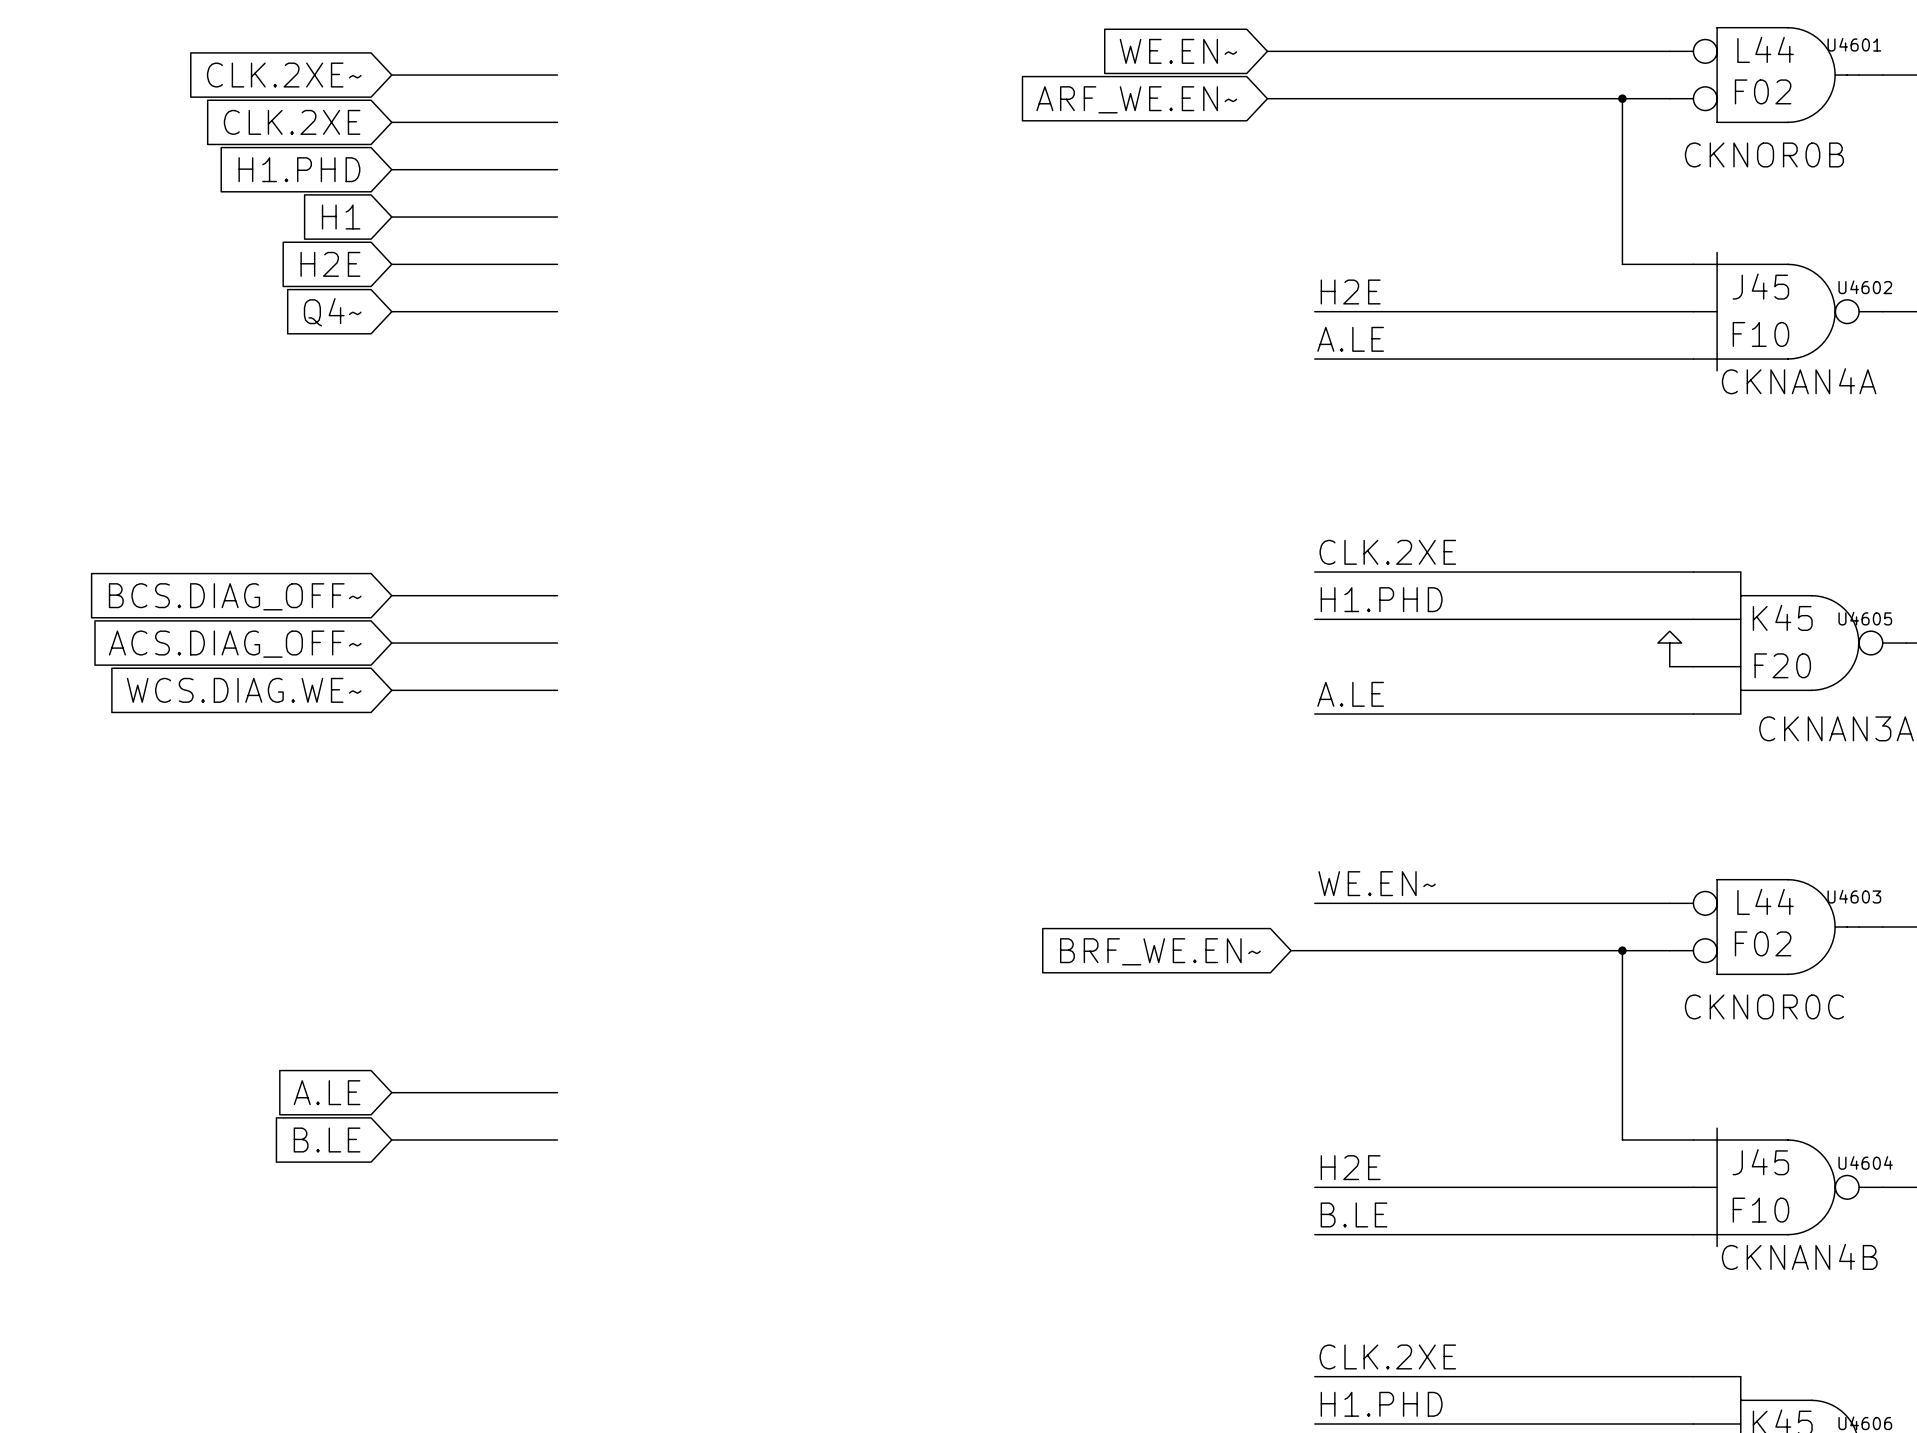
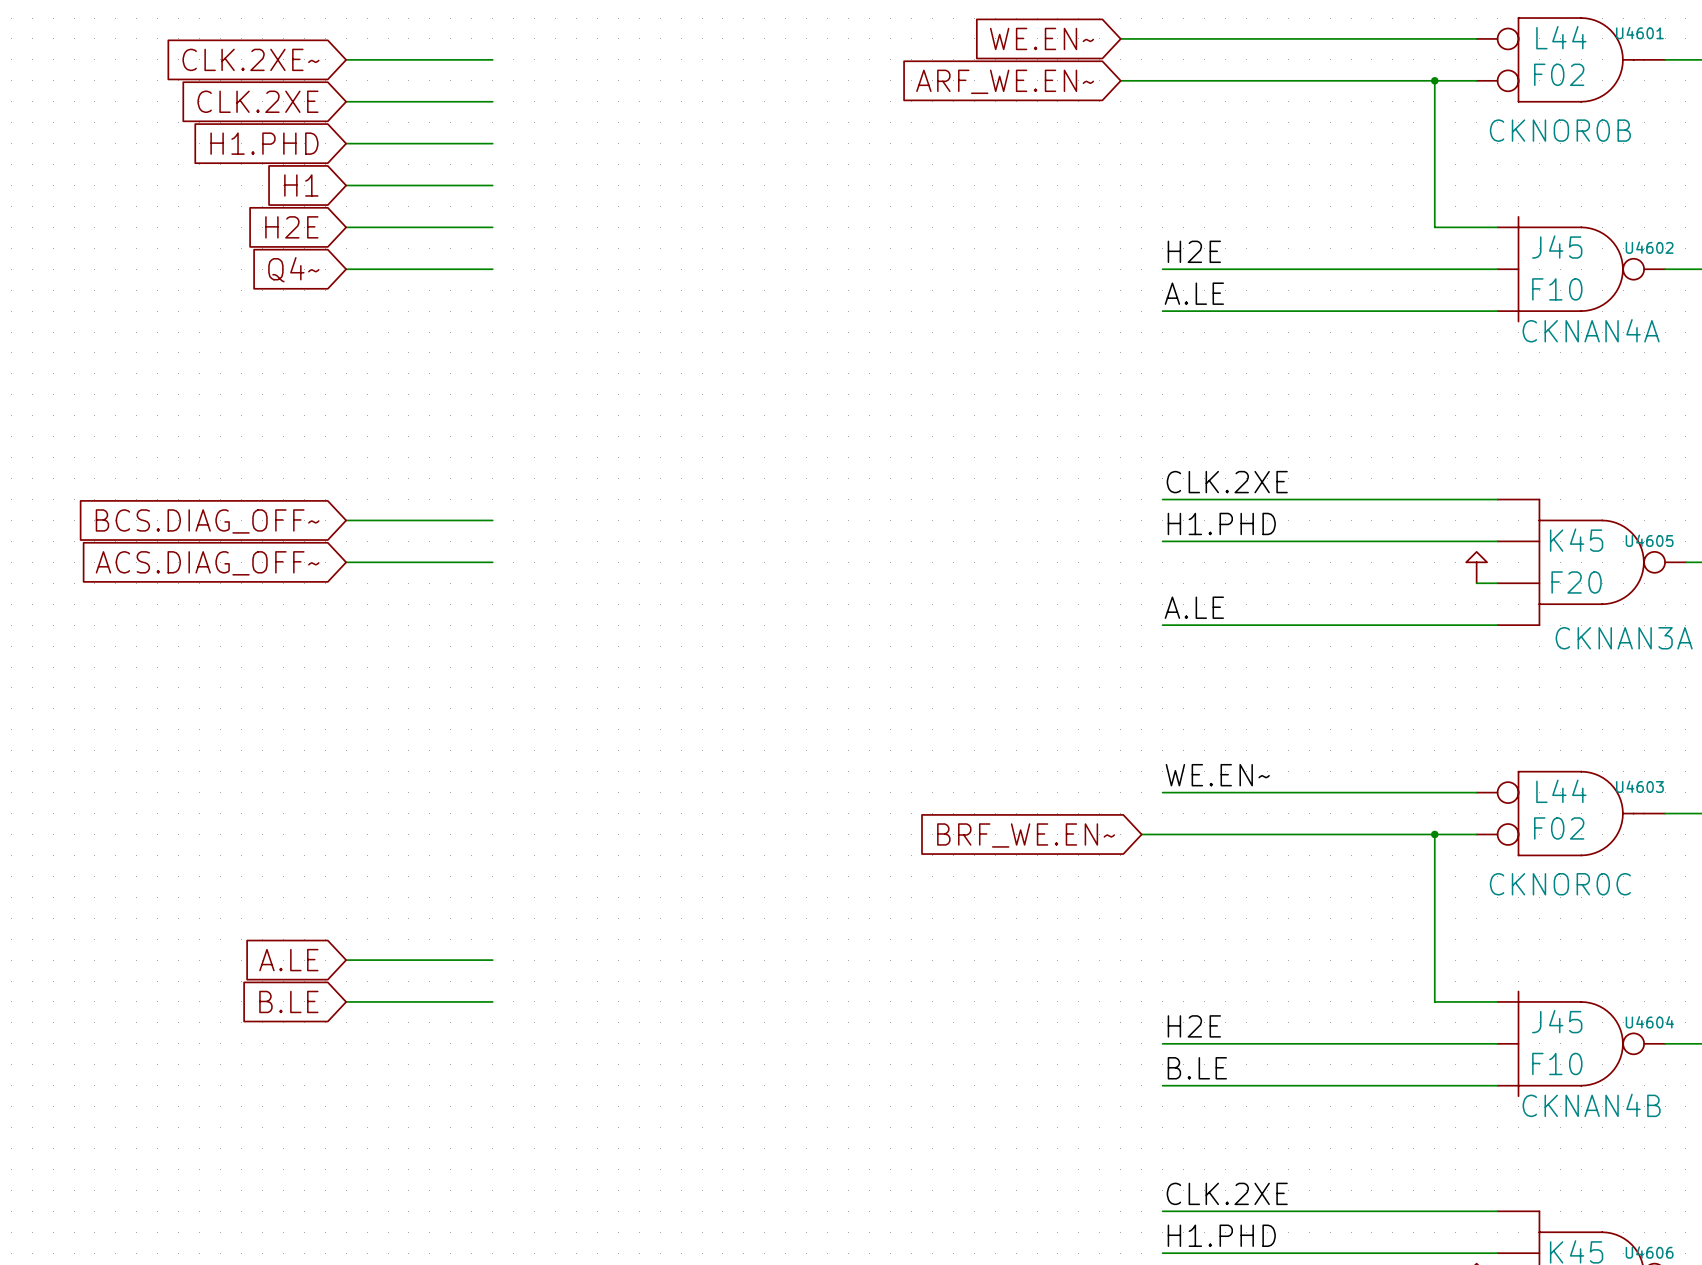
global label: WCS.DIAG.WE~ (244, 690) -> none
wire: (391, 690) (557, 690) -> none

